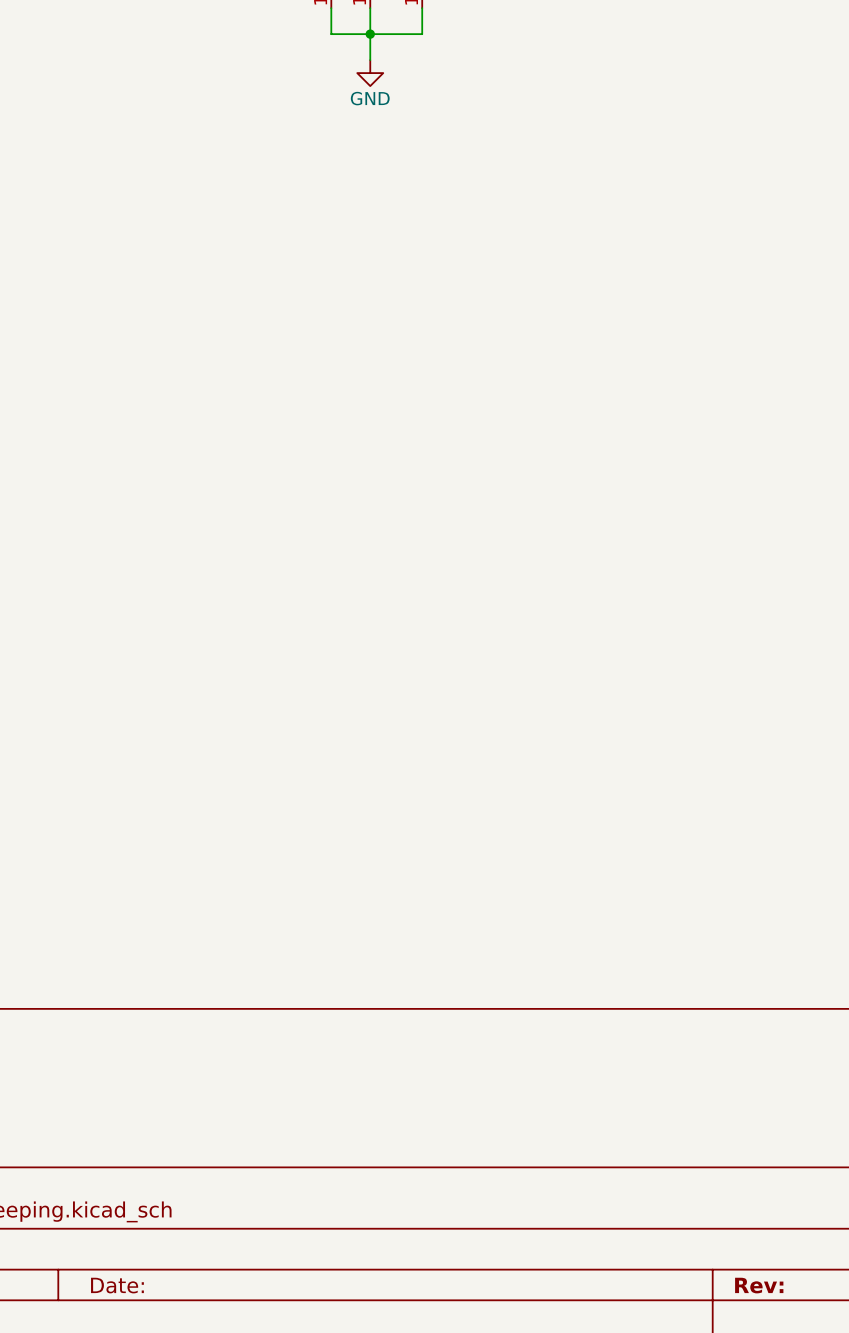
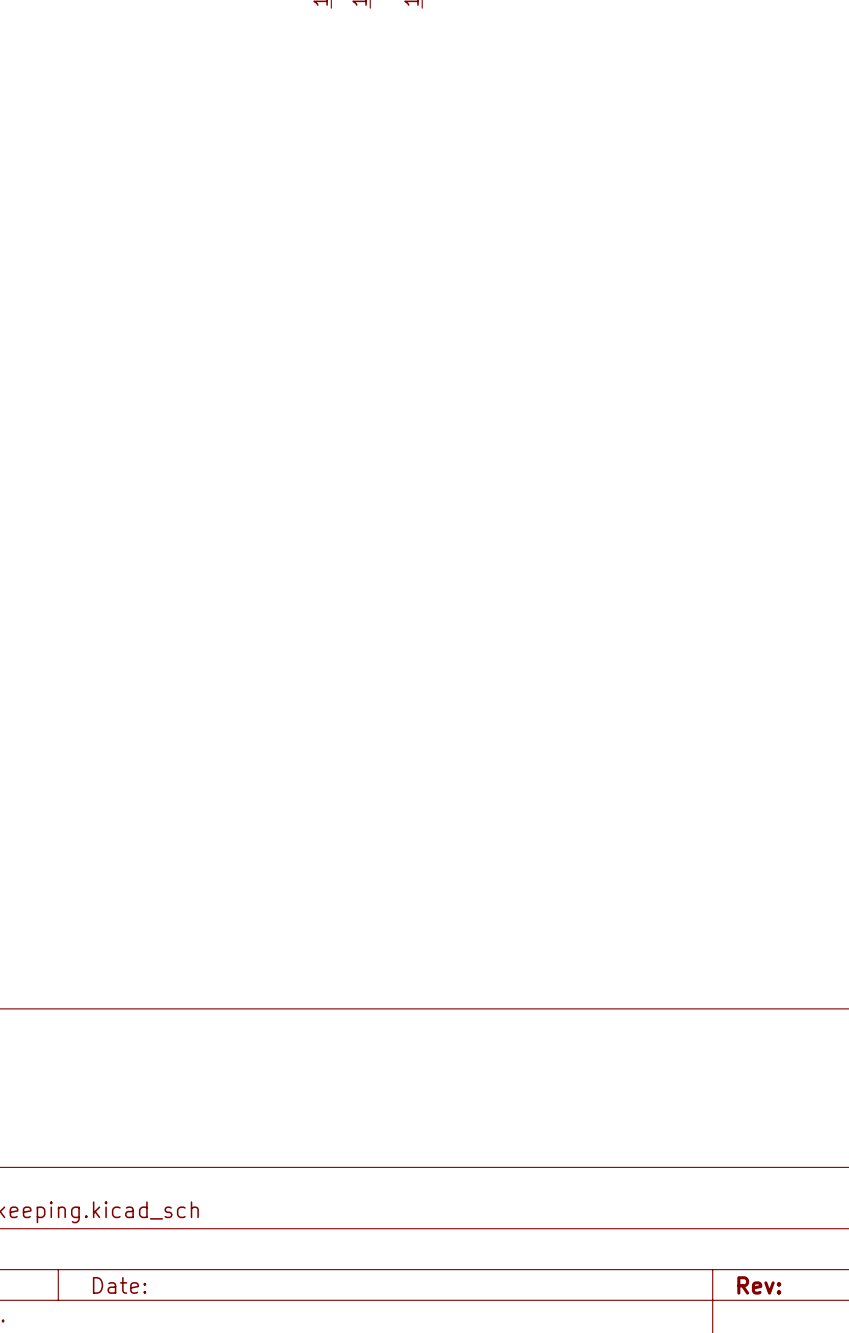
wire: (331, 8) (331, 34) (422, 34) (422, 8) -> none
wire: (370, 8) (370, 60) -> none
junction: (370, 34) -> none
power symbol: GND (370, 73) -> none

